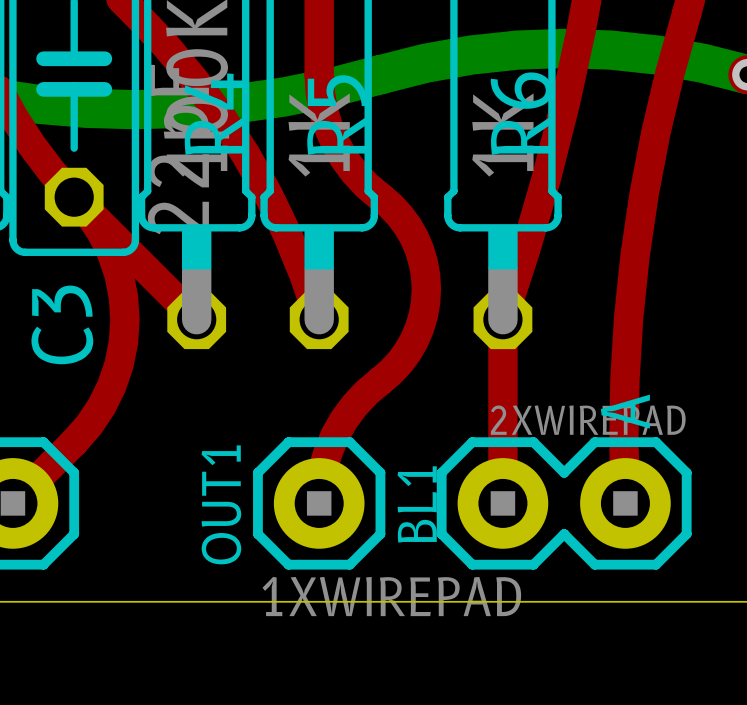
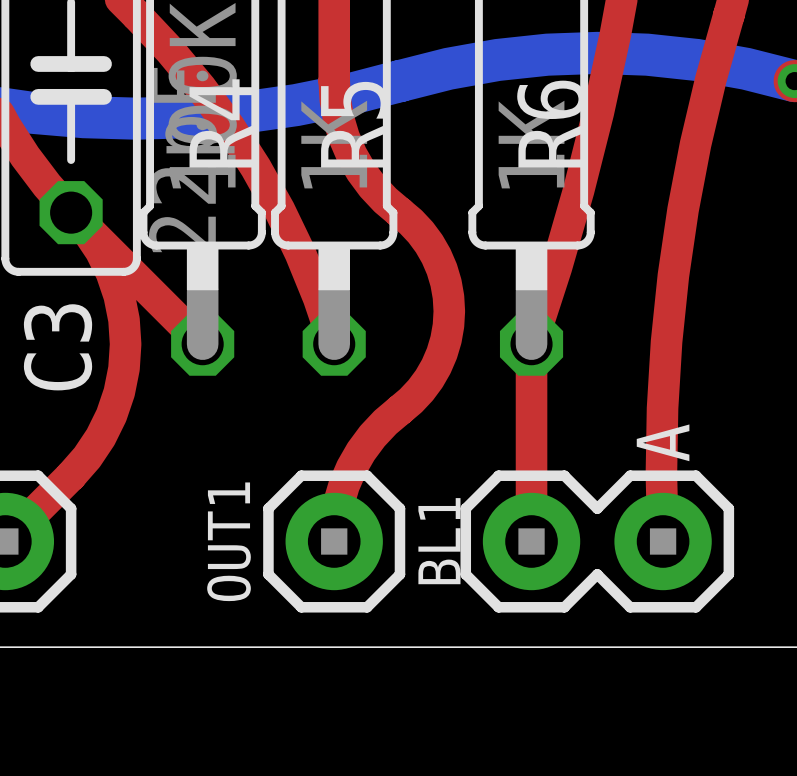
BL1 value: 2XWIREPAD (588, 420) -> none
OUT1 value: 1XWIREPAD (391, 596) -> none

